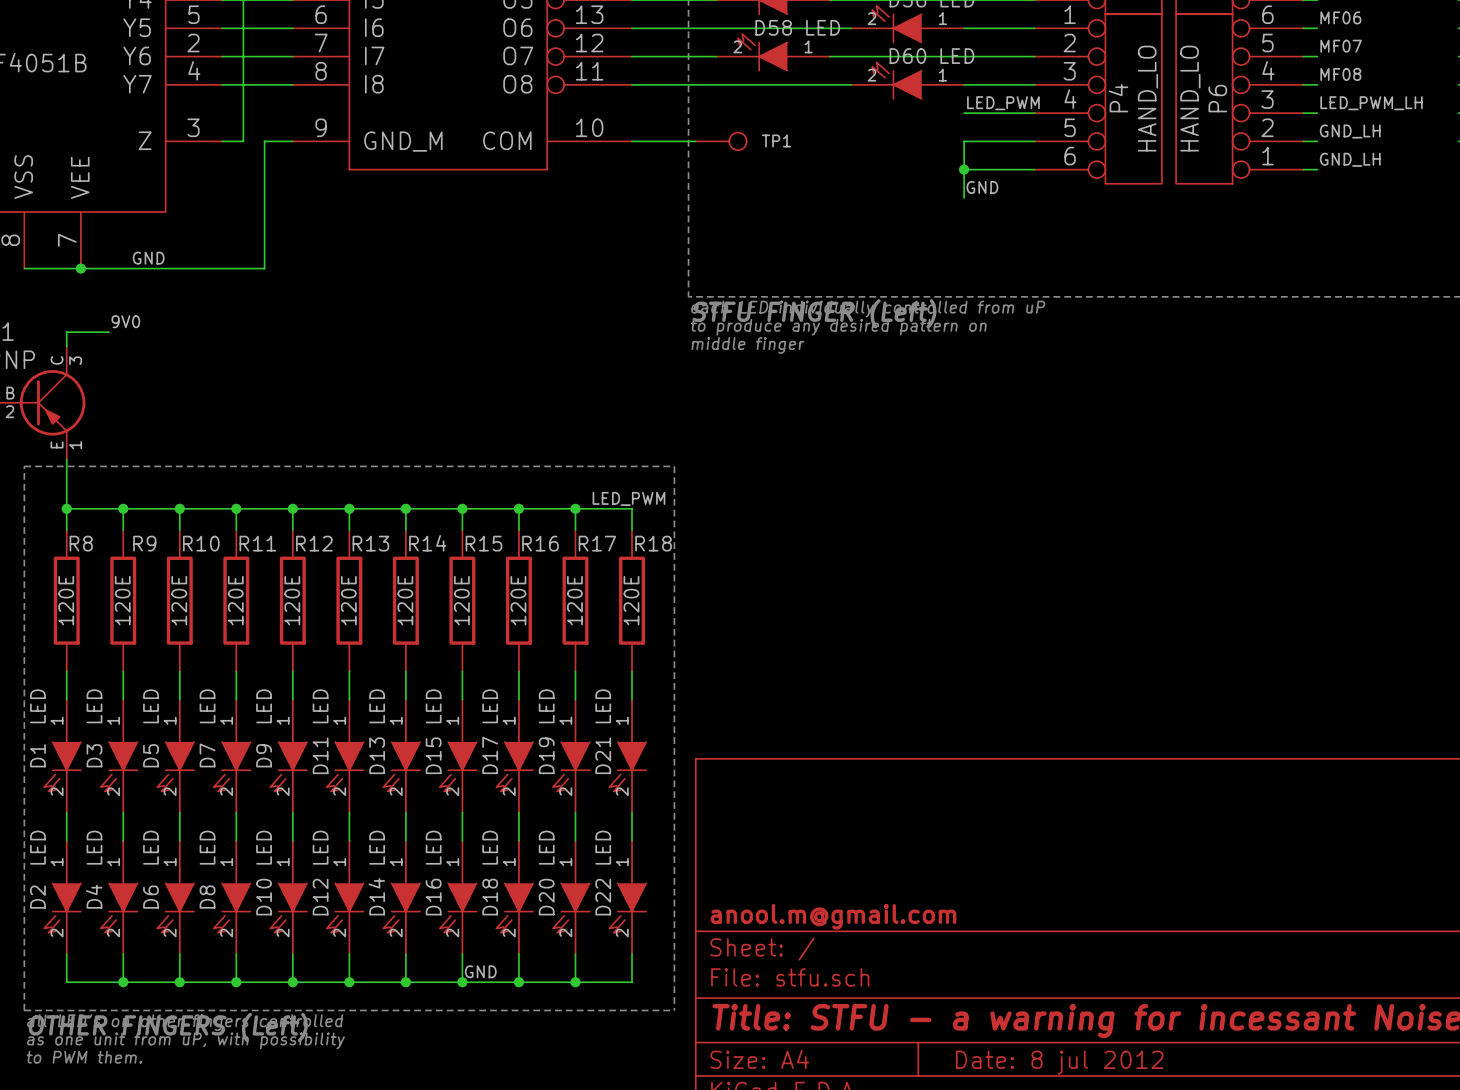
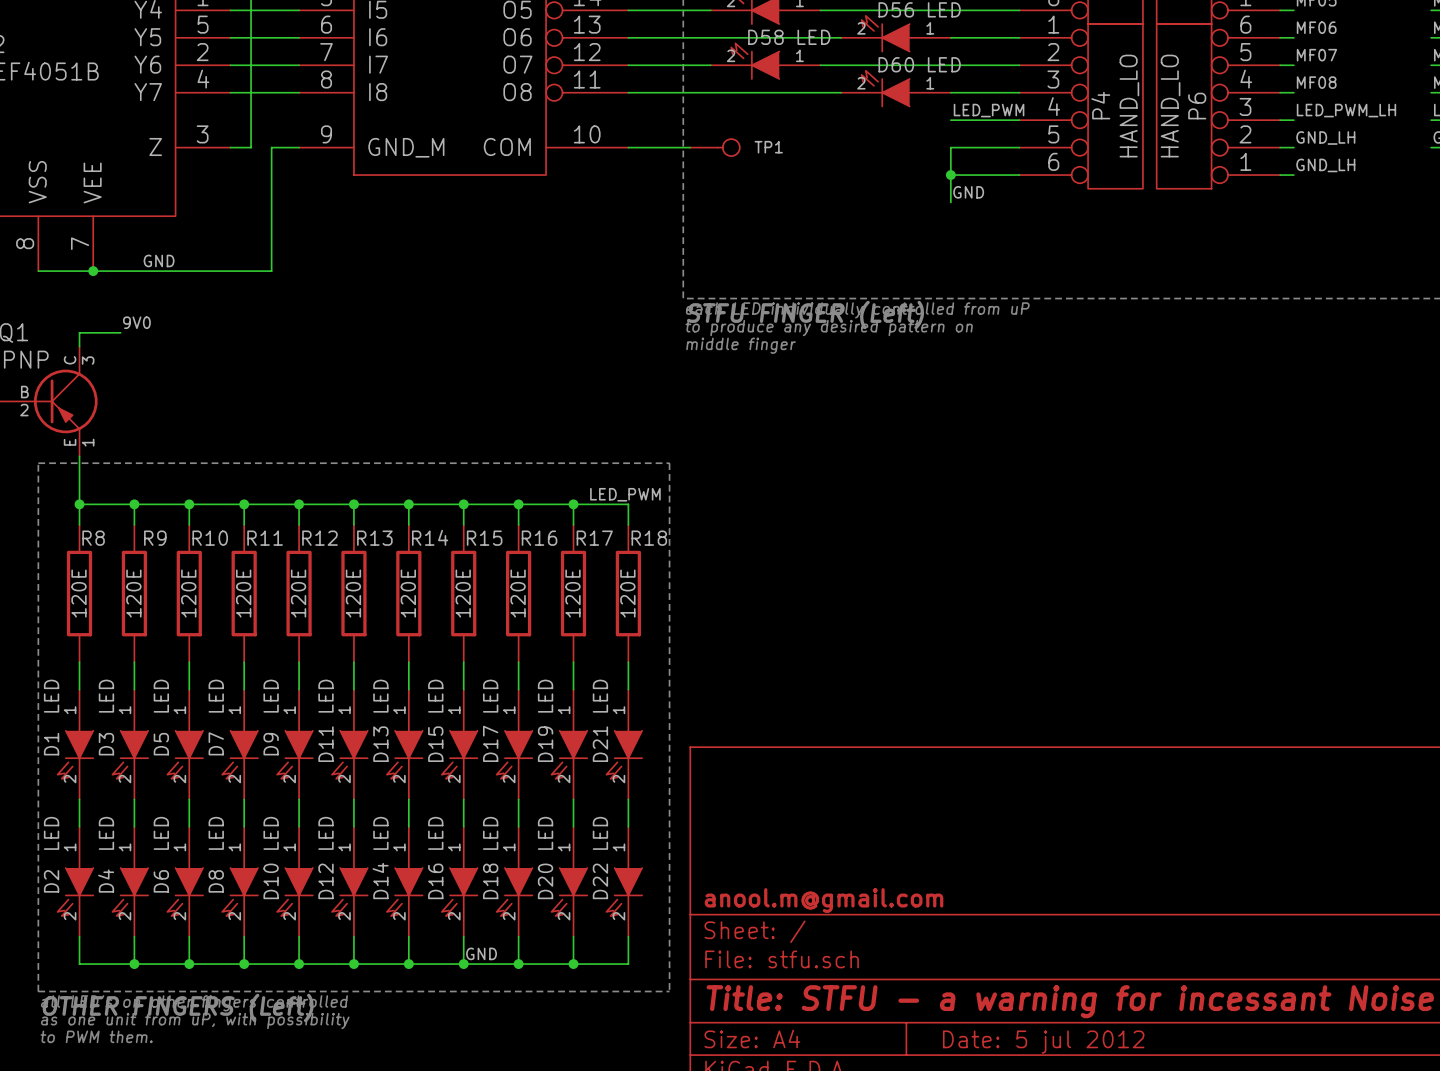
title block: Date: 8 jul 2012 (1059, 1062) -> Date: 5 jul 2012 (1043, 1042)

